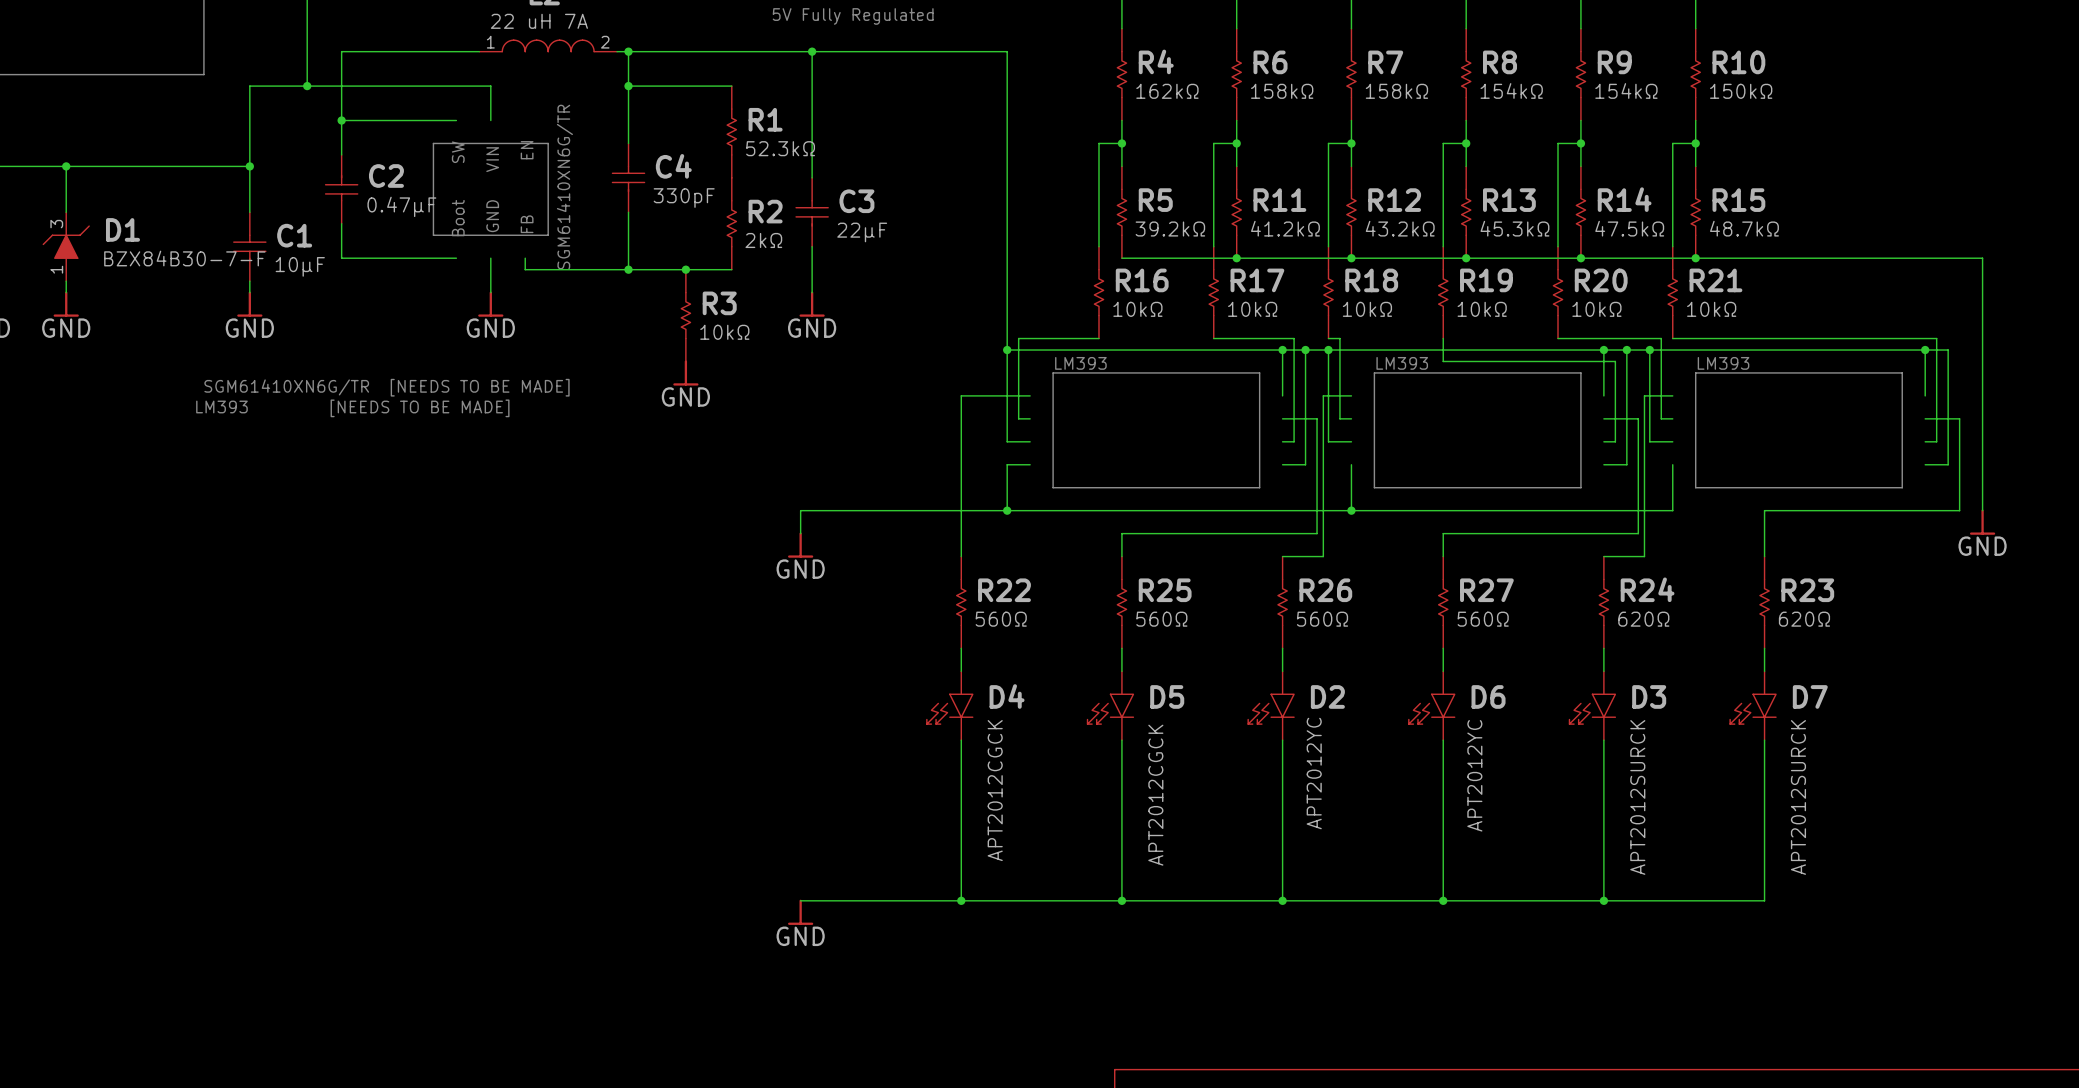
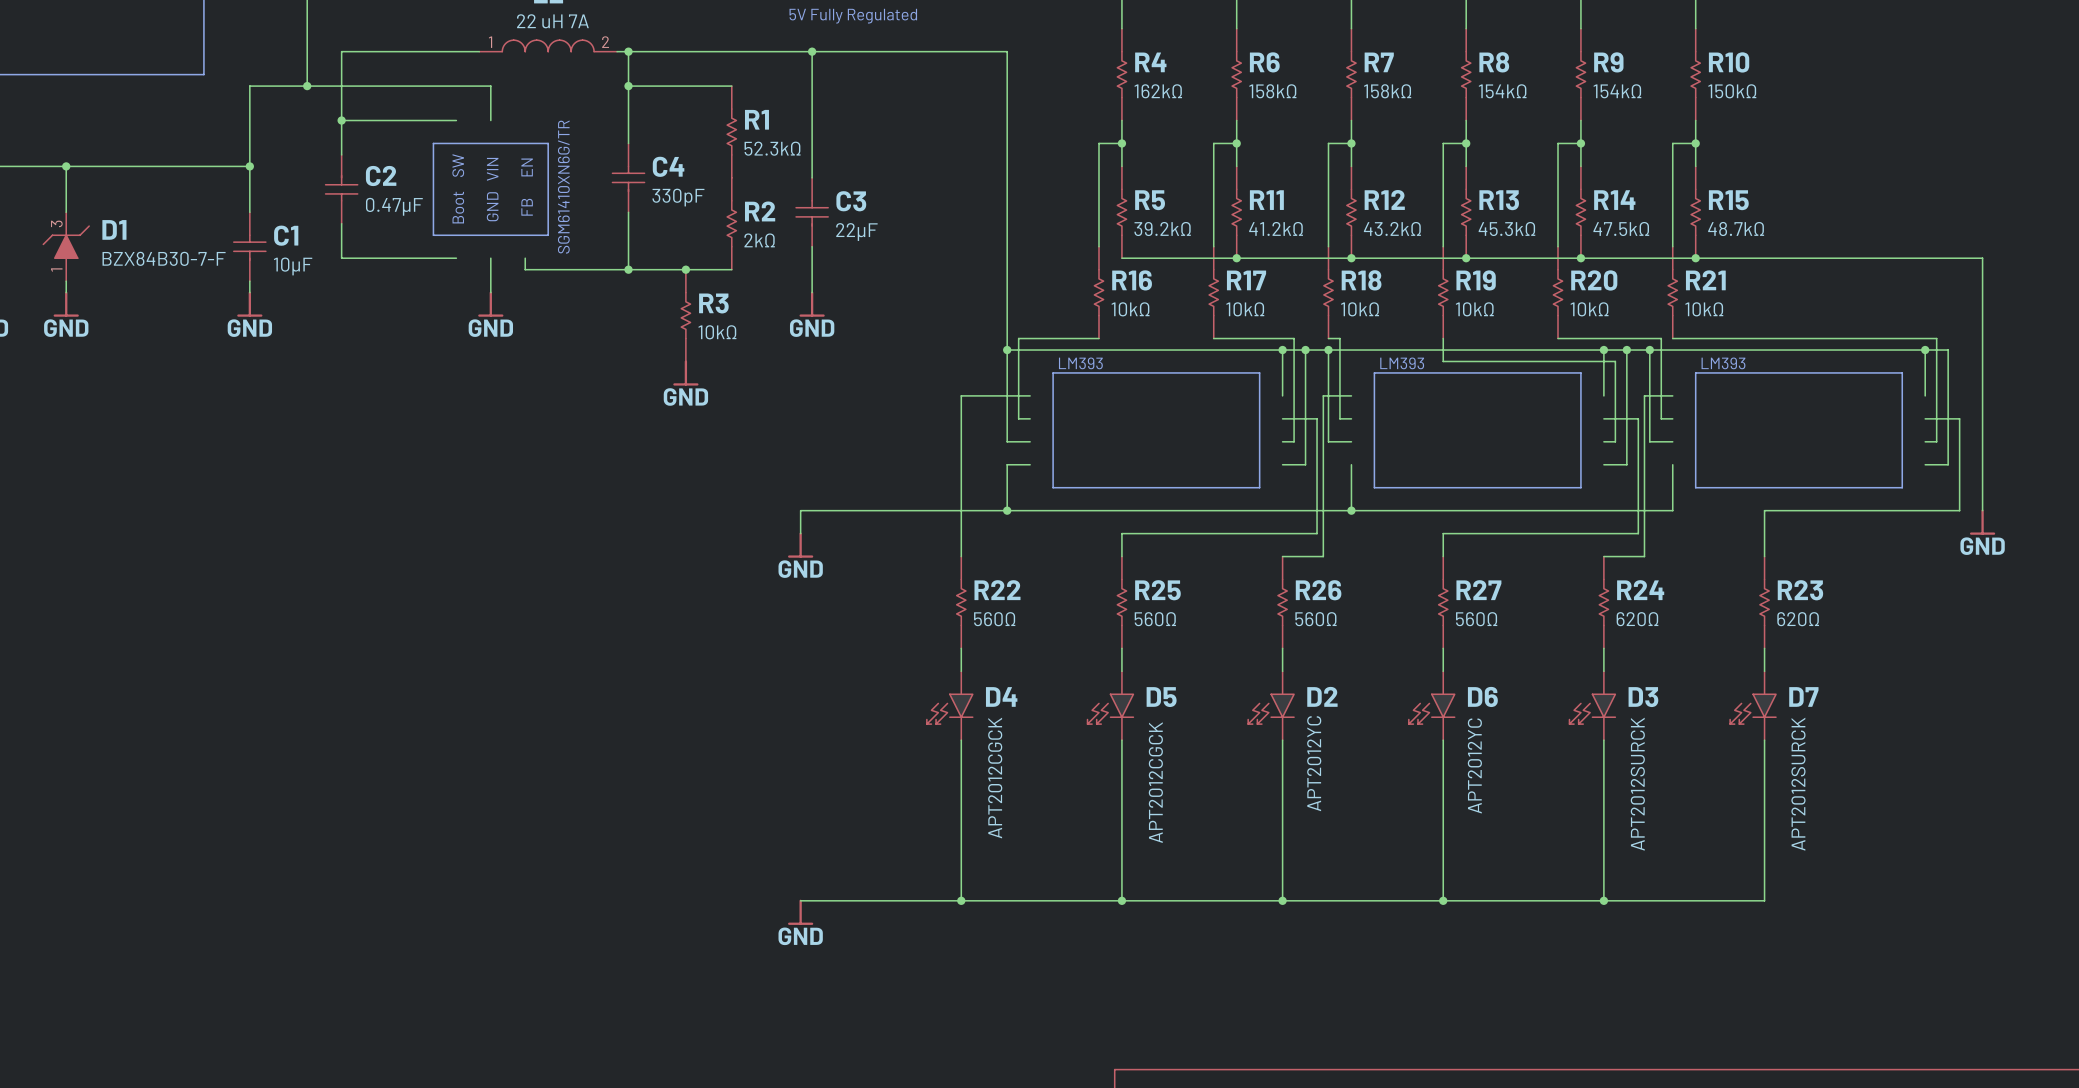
text: SGM61410XN6G/TR [NEEDS TO BE MADE] (386, 387) -> none
text: LM393 [NEEDS TO BE MADE] (352, 408) -> none

